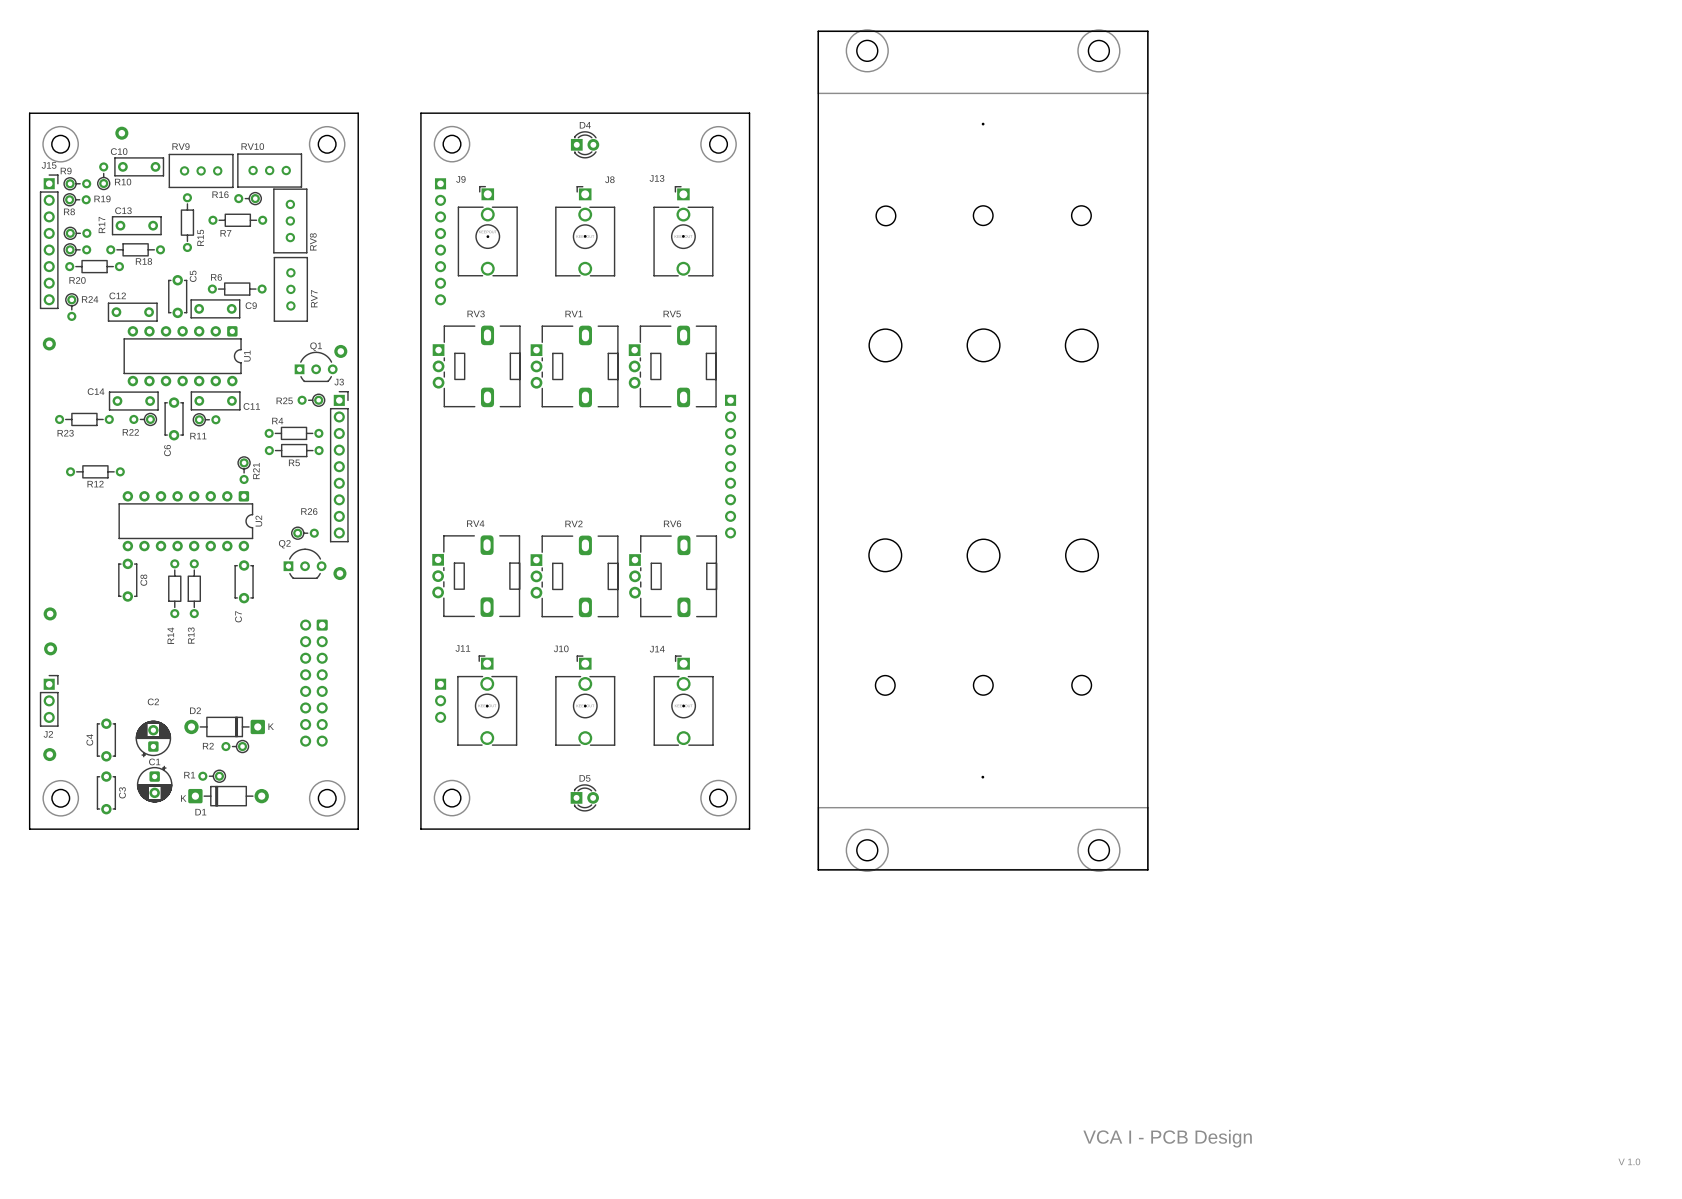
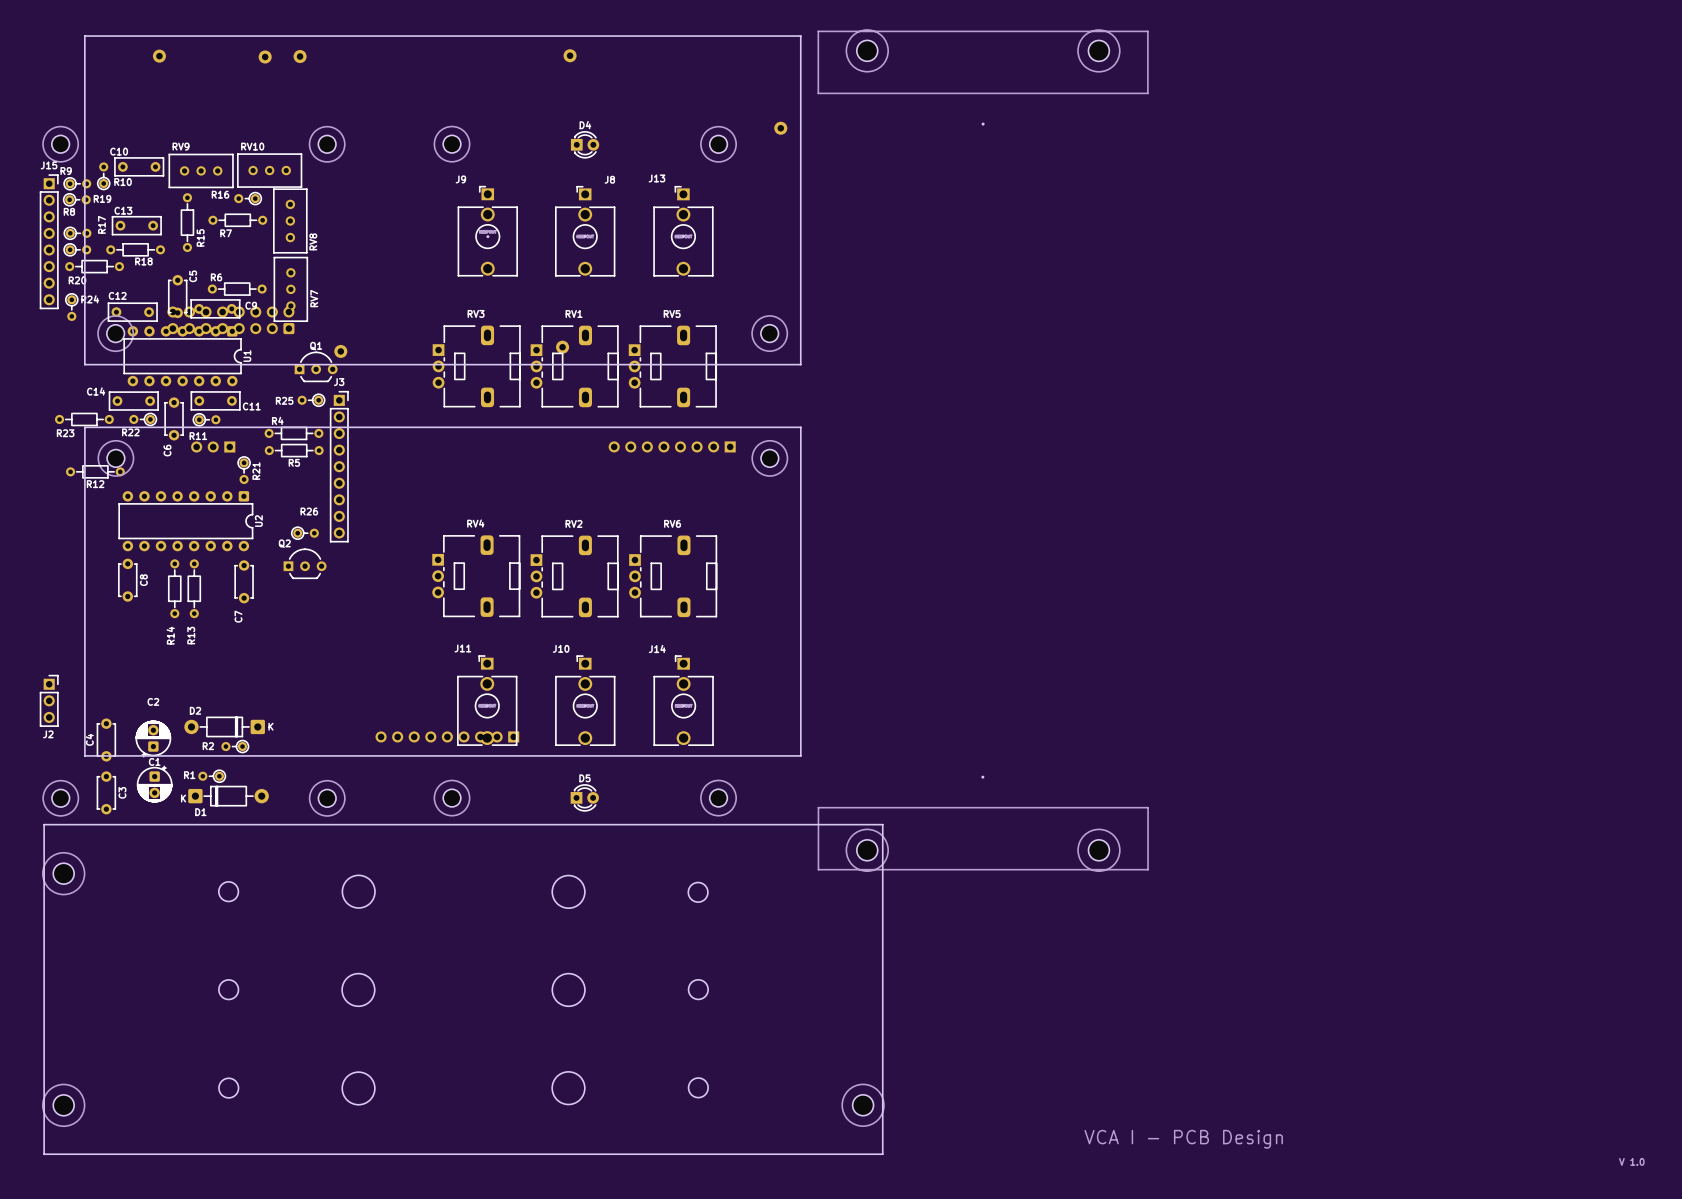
board edge: (818, 31) (1147, 31) (1147, 869) (818, 869) (818, 31) -> none
board edge: none -> (84, 36) (800, 36) (800, 364) (84, 364) (84, 36)
part: none -> (570, 55)
part: none -> (159, 56)
part: none -> (265, 56)
part: none -> (300, 56)
board edge: (29, 113) (358, 113) (358, 829) (29, 829) (29, 113) -> none
board edge: (420, 113) (749, 113) (749, 829) (420, 829) (420, 113) -> none
part: none -> (780, 128)
part: (121, 133) -> none
round board edge: [875, 205, 896, 226] -> none
round board edge: [973, 205, 994, 226] -> none
round board edge: [1071, 205, 1092, 226] -> none
part: (440, 241) -> none
part: none -> (230, 320)
round board edge: [869, 328, 902, 362] -> none
round board edge: [967, 328, 1001, 362] -> none
round board edge: [1065, 329, 1099, 362] -> none
part: none -> (115, 333)
part: none -> (769, 333)
part: (49, 343) -> none
part: none -> (562, 347)
board edge: none -> (84, 427) (800, 427) (800, 755) (84, 755) (84, 427)
part: none -> (213, 446)
part: none -> (672, 446)
part: none -> (115, 458)
part: none -> (769, 458)
part: (730, 466) -> none
round board edge: [868, 538, 902, 572] -> none
round board edge: [1065, 538, 1099, 572] -> none
round board edge: [967, 539, 1001, 573] -> none
part: (339, 573) -> none
part: (50, 613) -> none
part: (50, 648) -> none
round board edge: [875, 675, 896, 696] -> none
round board edge: [973, 675, 994, 696] -> none
round board edge: [1071, 675, 1092, 696] -> none
part: (313, 683) -> none
part: (440, 700) -> none
part: none -> (447, 736)
part: (49, 754) -> none
board edge: none -> (44, 824) (882, 824) (882, 1154) (44, 1154) (44, 824)
part: none -> (63, 873)
round board edge: none -> [342, 875, 376, 909]
round board edge: none -> [552, 875, 586, 909]
round board edge: none -> [218, 881, 239, 902]
round board edge: none -> [688, 882, 709, 903]
round board edge: none -> [341, 973, 375, 1007]
round board edge: none -> [552, 973, 586, 1007]
round board edge: none -> [218, 979, 239, 1000]
round board edge: none -> [688, 979, 709, 1000]
round board edge: none -> [342, 1071, 376, 1105]
round board edge: none -> [552, 1071, 585, 1105]
round board edge: none -> [688, 1077, 709, 1098]
round board edge: none -> [218, 1078, 239, 1099]
part: none -> (63, 1105)
part: none -> (863, 1105)

